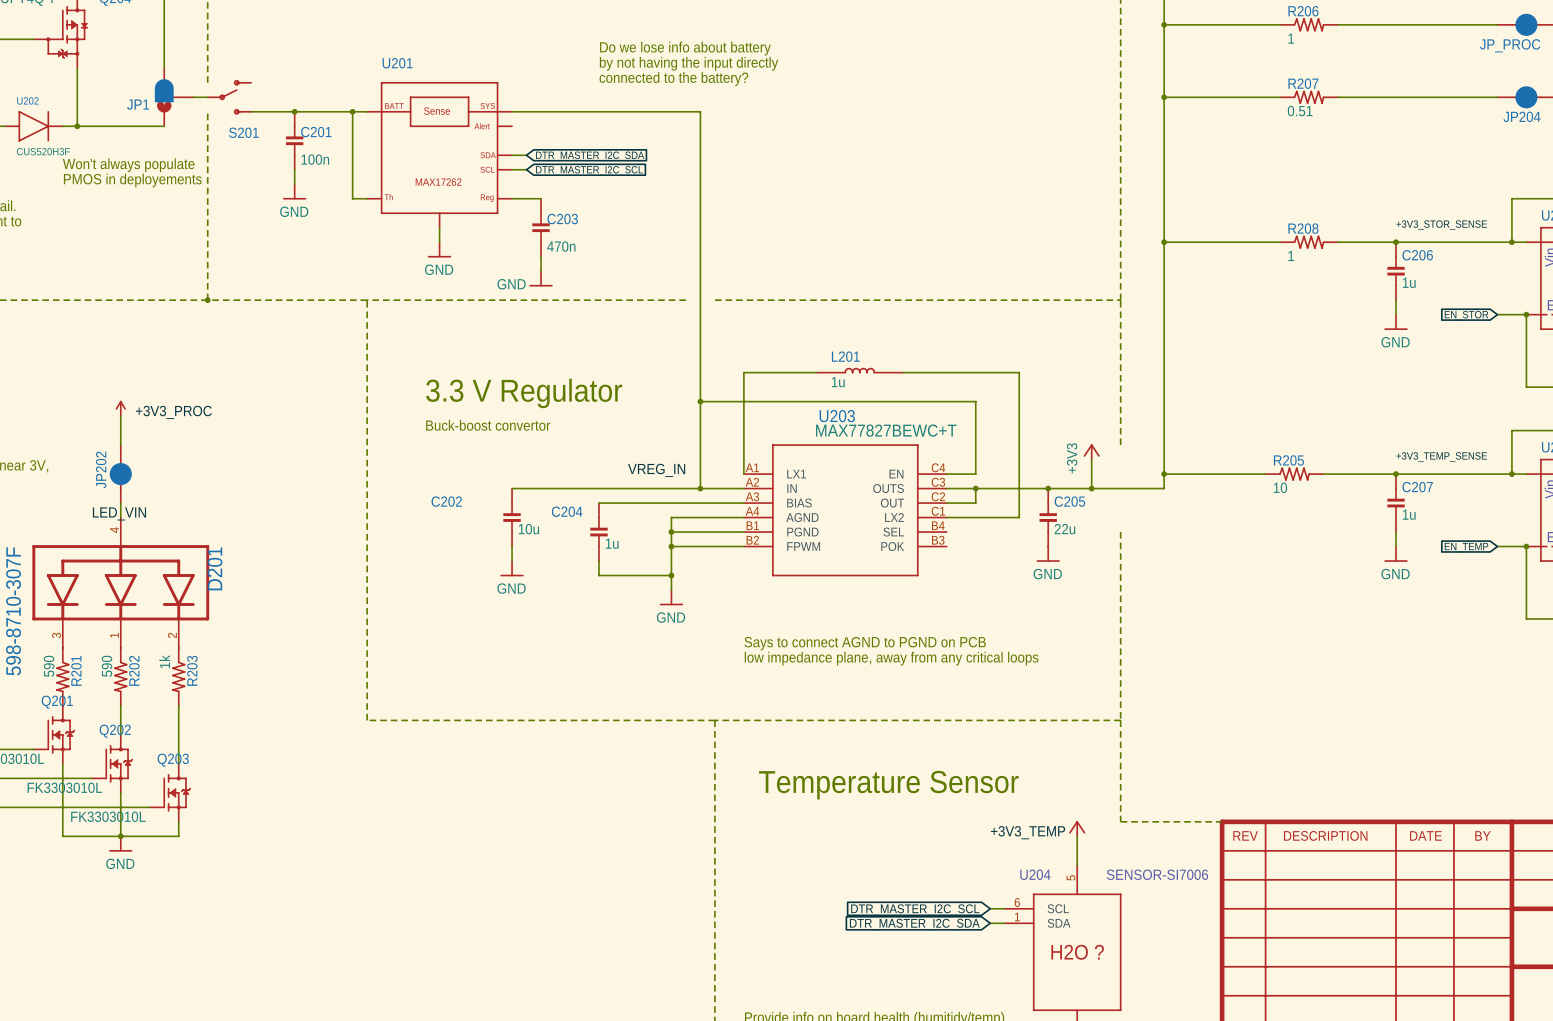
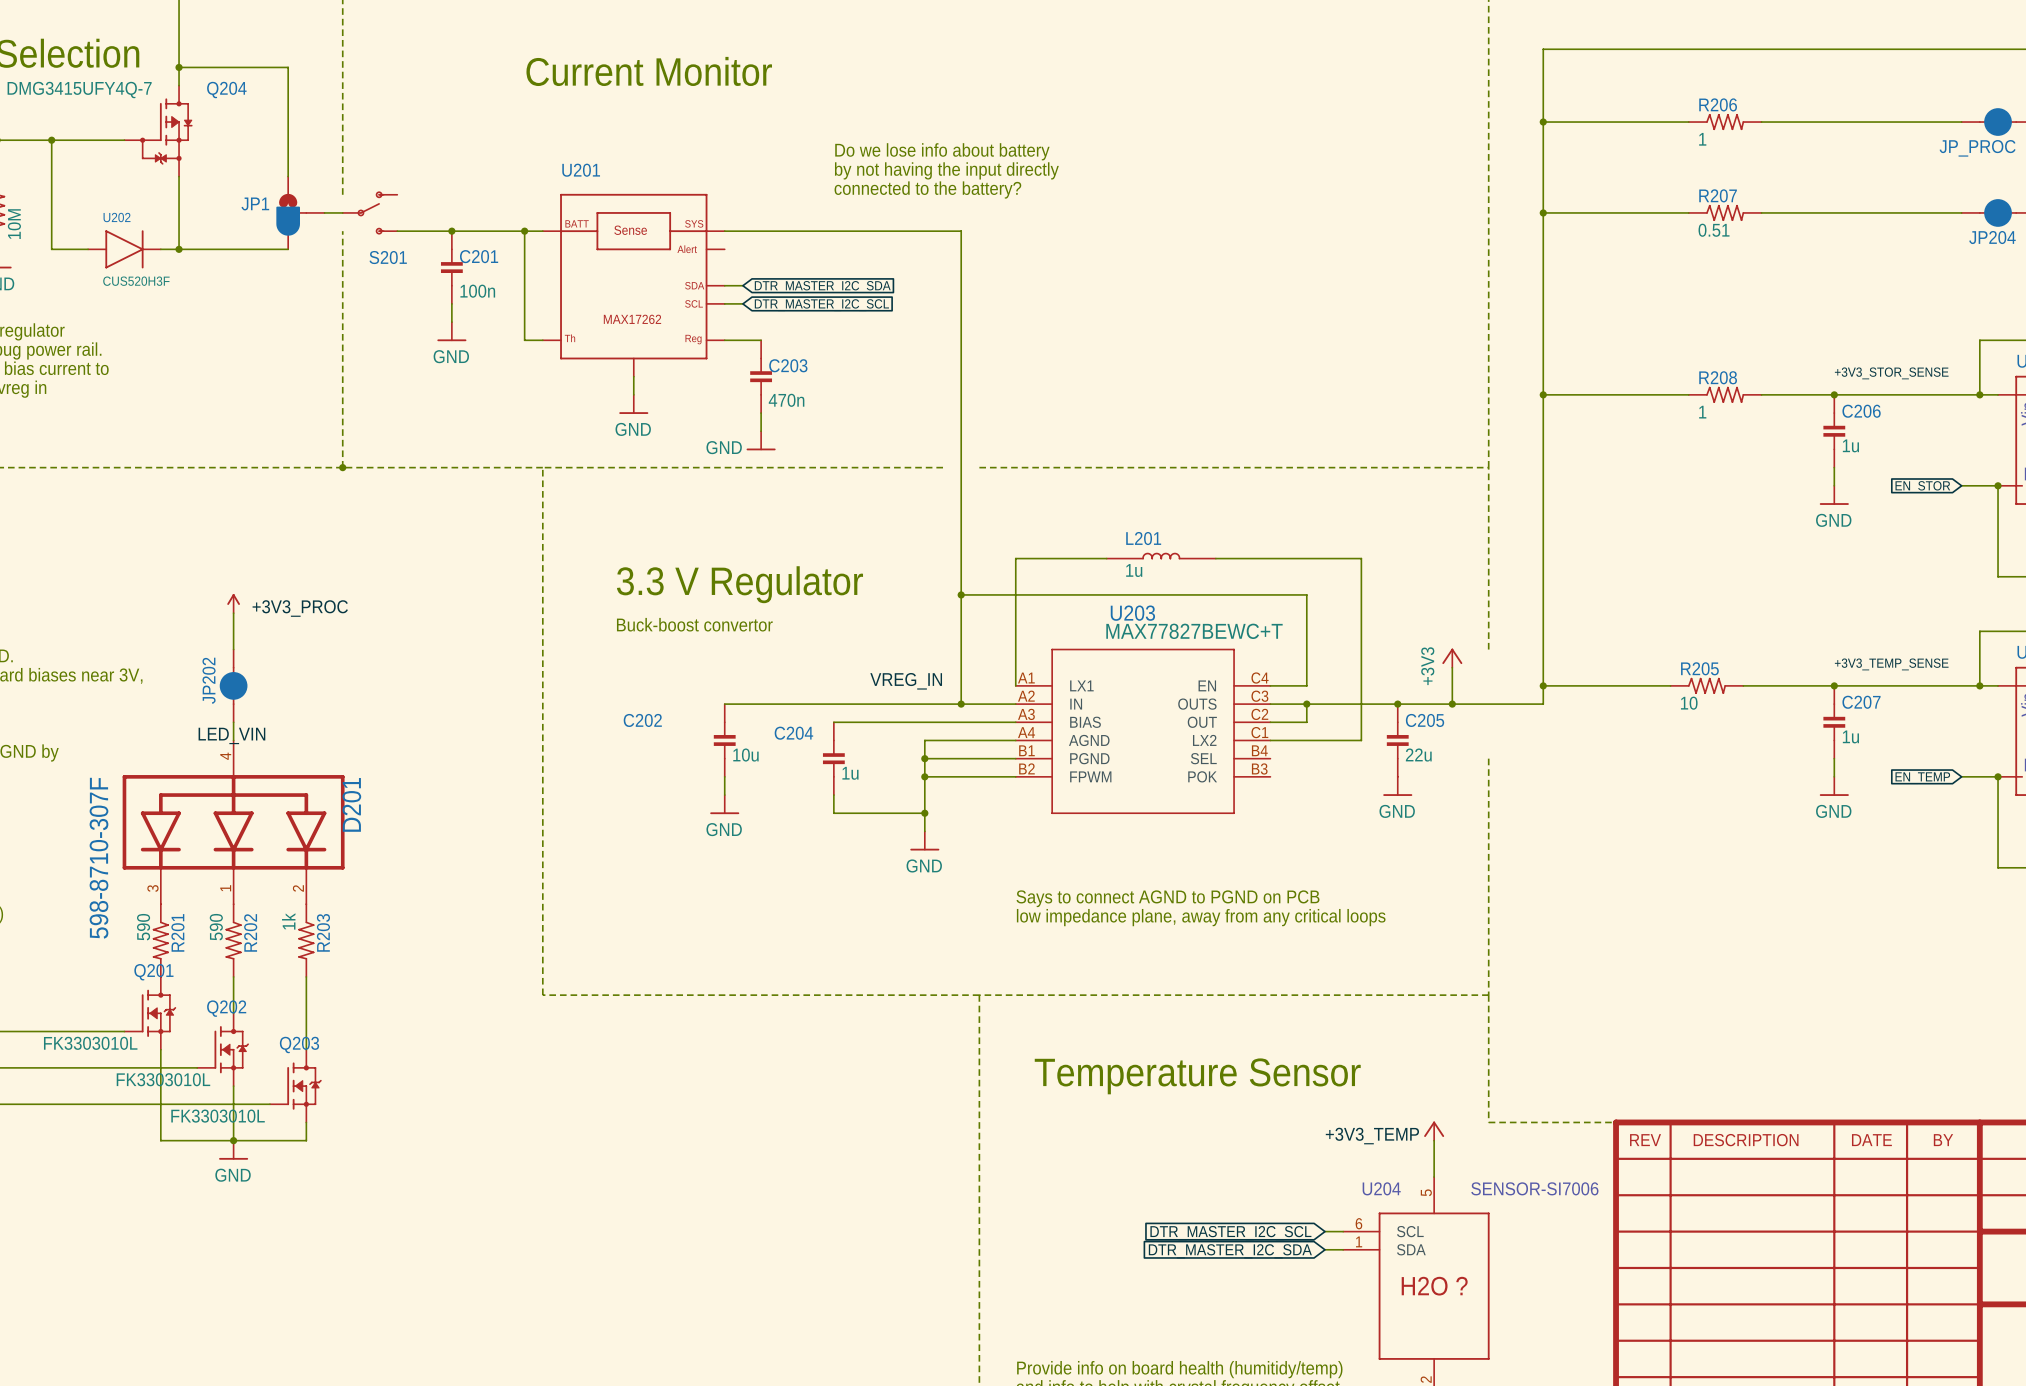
JP1 flip: as is (167, 95) -> up-down (291, 214)
text: Won't always populate (128, 165) -> none
text: PMOS in deployements (132, 180) -> none

